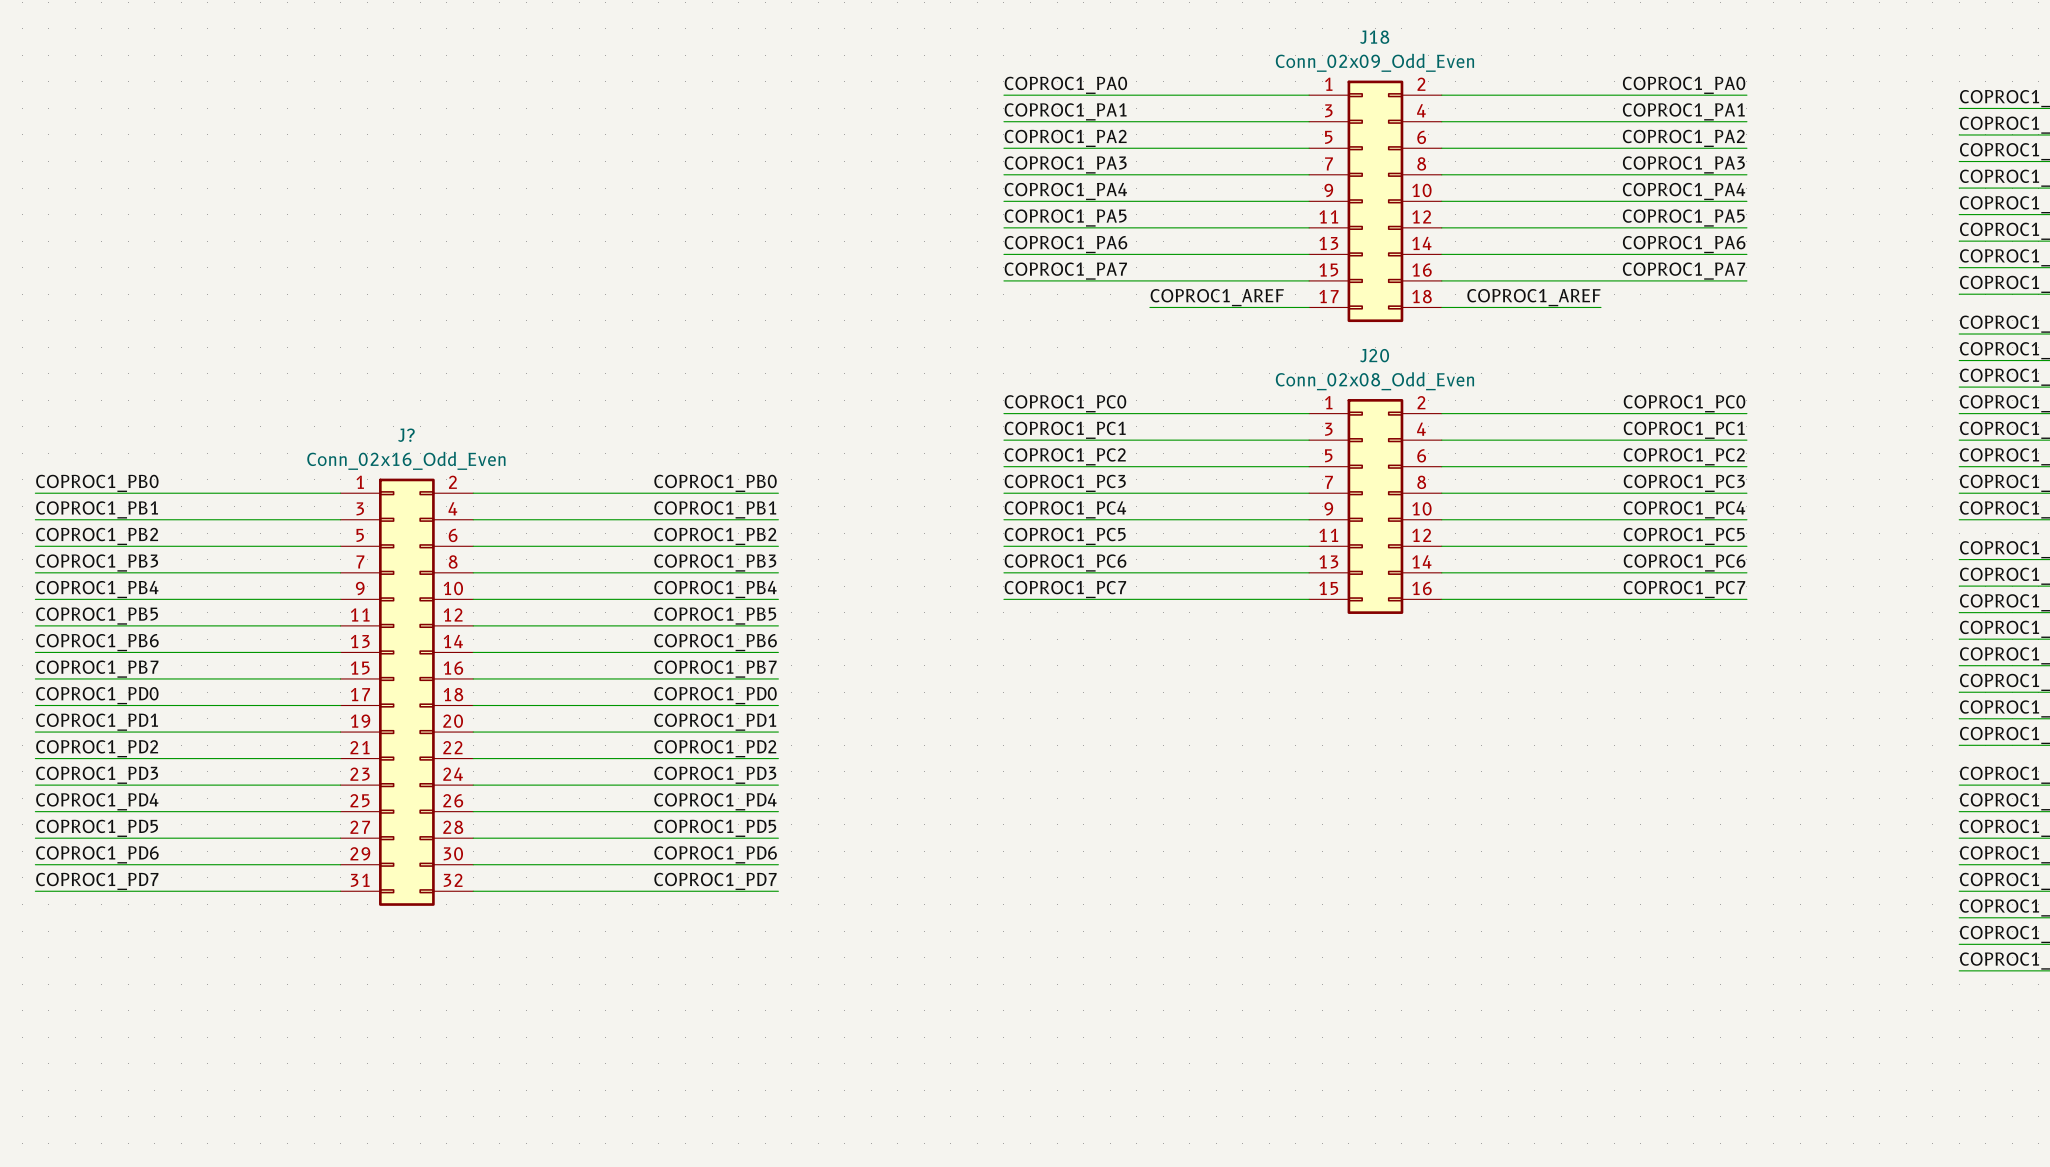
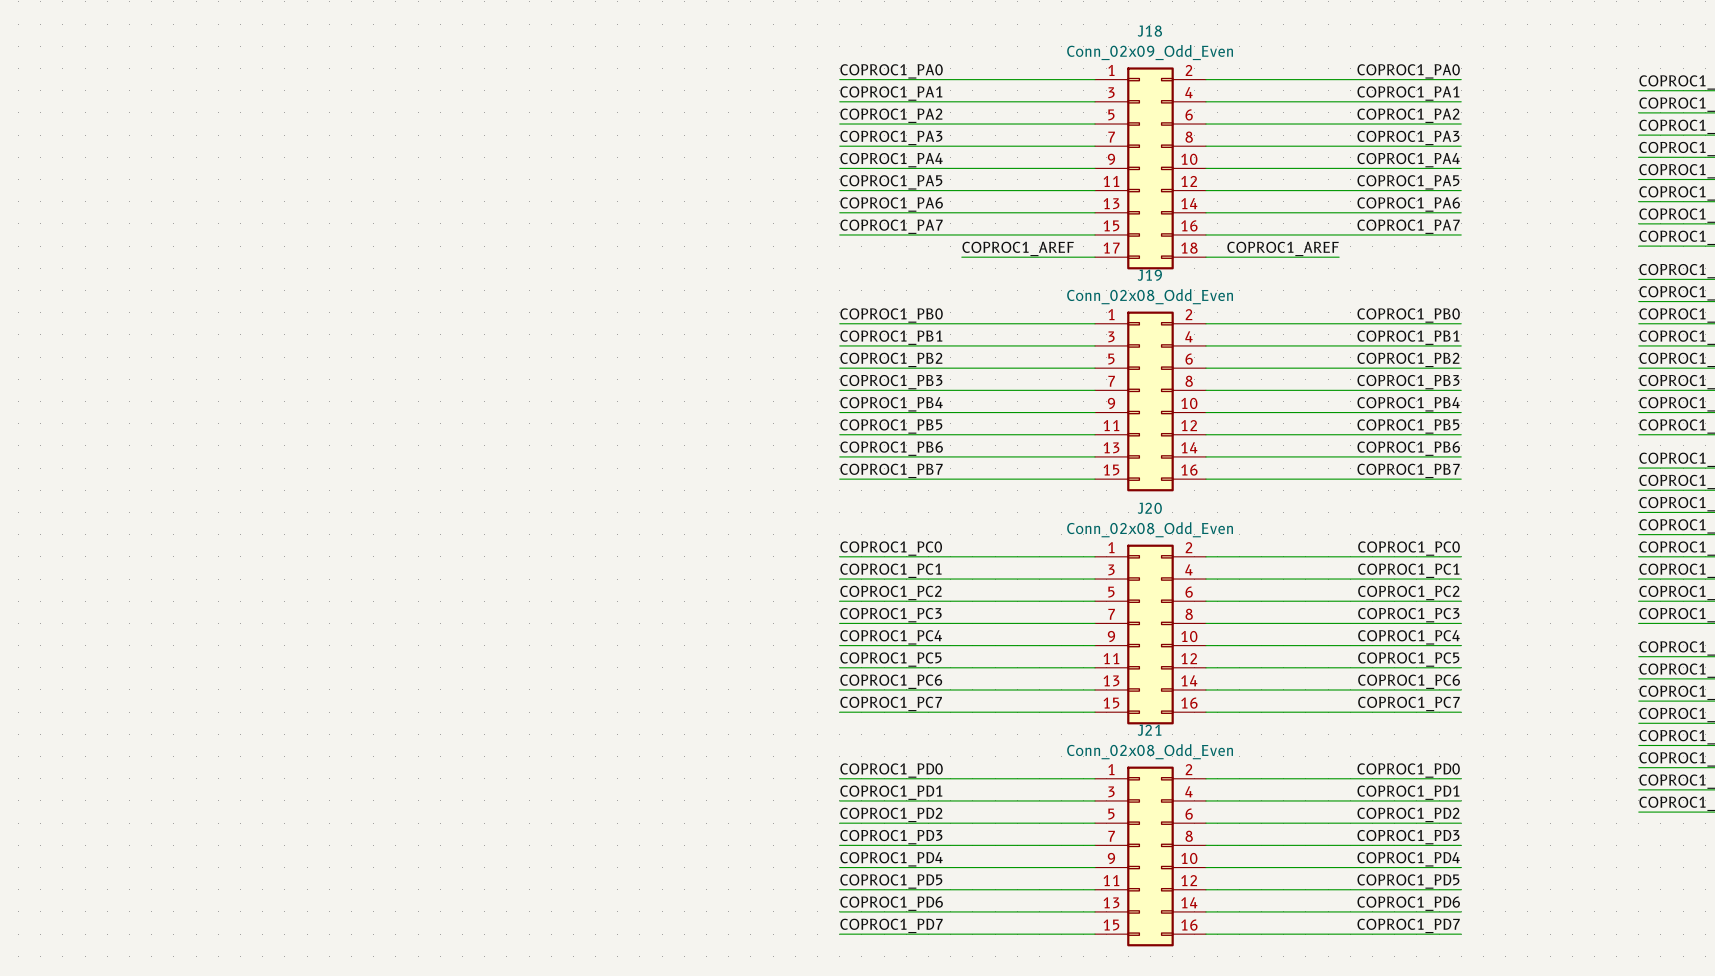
label: none -> COPROC1_PB0 (1408, 315)
wire: none -> (839, 323) (1094, 323)
wire: none -> (1205, 323) (1461, 323)
label: COPROC1_PC0 (1065, 403) -> COPROC1_PB1 (891, 337)
label: COPROC1_PC0 (1684, 403) -> COPROC1_PB1 (1408, 337)
label: COPROC1_PC1 (1065, 430) -> COPROC1_PB2 (891, 359)
label: COPROC1_PC1 (1684, 430) -> COPROC1_PB2 (1408, 359)
label: COPROC1_PC2 (1065, 456) -> COPROC1_PB3 (891, 382)
label: COPROC1_PC2 (1684, 456) -> COPROC1_PB3 (1408, 382)
J19: none -> Conn_02x08_Odd_Even (1150, 401)
label: COPROC1_PB0 (97, 483) -> none
label position: COPROC1_PB0 (715, 483) -> COPROC1_PB0 (891, 315)
label: COPROC1_PC3 (1065, 483) -> COPROC1_PB4 (891, 404)
label: COPROC1_PC3 (1684, 483) -> COPROC1_PB4 (1408, 404)
wire: (35, 493) (340, 493) -> none
wire: (473, 493) (778, 493) -> none
J20 position: (1375, 506) -> (1150, 634)
label: COPROC1_PB1 (97, 509) -> none
label: COPROC1_PB1 (715, 509) -> none
label: COPROC1_PC4 (1065, 509) -> COPROC1_PB5 (891, 426)
label: COPROC1_PC4 (1684, 509) -> COPROC1_PB5 (1408, 426)
wire: (35, 519) (340, 519) -> none
wire: (473, 519) (778, 519) -> none
label: COPROC1_PB2 (97, 536) -> none
label: COPROC1_PB2 (715, 536) -> none
label: COPROC1_PC5 (1065, 536) -> COPROC1_PB6 (891, 448)
label: COPROC1_PC5 (1684, 536) -> COPROC1_PB6 (1408, 448)
wire: (35, 546) (340, 546) -> none
wire: (473, 546) (778, 546) -> none
label: COPROC1_PB3 (97, 562) -> none
label: COPROC1_PB3 (715, 562) -> none
label: COPROC1_PC6 (1065, 562) -> COPROC1_PB7 (891, 470)
label: COPROC1_PC6 (1684, 562) -> COPROC1_PB7 (1408, 470)
wire: (35, 572) (340, 572) -> none
wire: (473, 572) (778, 572) -> none
label: COPROC1_PB4 (97, 589) -> none
label: COPROC1_PB4 (715, 589) -> none
label position: COPROC1_PC7 (1065, 589) -> COPROC1_PC7 (891, 703)
label position: COPROC1_PC7 (1684, 589) -> COPROC1_PC7 (1408, 703)
wire: (35, 599) (340, 599) -> none
wire: (473, 599) (778, 599) -> none
wire: (1003, 599) (1309, 599) -> (839, 556) (1094, 556)
wire: (1441, 599) (1746, 599) -> (1205, 556) (1461, 556)
label: COPROC1_PB5 (97, 616) -> none
label: COPROC1_PB5 (715, 616) -> none
wire: (35, 625) (340, 625) -> none
wire: (473, 625) (778, 625) -> none
label: COPROC1_PB6 (97, 642) -> none
label: COPROC1_PB6 (715, 642) -> none
wire: (35, 652) (340, 652) -> none
wire: (473, 652) (778, 652) -> none
label: none -> COPROC1_PC0 (891, 548)
label: none -> COPROC1_PC0 (1409, 548)
label: COPROC1_PB7 (97, 669) -> none
label: COPROC1_PB7 (715, 669) -> none
wire: (35, 678) (340, 678) -> none
wire: (473, 678) (778, 678) -> none
label: none -> COPROC1_PC1 (890, 570)
label: none -> COPROC1_PC1 (1408, 570)
J?: Conn_02x16_Odd_Even (406, 692) -> none
wire: none -> (839, 579) (1094, 579)
wire: none -> (1205, 579) (1461, 579)
label: COPROC1_PD0 (97, 695) -> none
label: COPROC1_PD0 (715, 695) -> none
wire: (35, 705) (340, 705) -> none
wire: (473, 705) (778, 705) -> none
label: none -> COPROC1_PC2 (891, 592)
label: none -> COPROC1_PC2 (1408, 592)
wire: none -> (839, 601) (1094, 601)
wire: none -> (1205, 601) (1461, 601)
label: COPROC1_PD1 (97, 722) -> none
label: COPROC1_PD1 (715, 722) -> none
wire: (35, 732) (340, 732) -> none
wire: (473, 732) (778, 732) -> none
label: none -> COPROC1_PC3 (891, 615)
label: none -> COPROC1_PC3 (1408, 615)
wire: none -> (839, 623) (1094, 623)
wire: none -> (1205, 623) (1461, 623)
label: COPROC1_PD2 (97, 748) -> none
label: COPROC1_PD2 (715, 748) -> none
wire: (35, 758) (340, 758) -> none
wire: (473, 758) (778, 758) -> none
label: none -> COPROC1_PC4 (891, 637)
label: none -> COPROC1_PC4 (1408, 637)
wire: none -> (839, 645) (1094, 645)
wire: none -> (1205, 645) (1461, 645)
label: COPROC1_PD3 (97, 775) -> none
label: COPROC1_PD3 (715, 775) -> none
wire: (35, 785) (340, 785) -> none
wire: (473, 785) (778, 785) -> none
label: none -> COPROC1_PC5 (890, 659)
label: none -> COPROC1_PC5 (1408, 659)
wire: none -> (839, 667) (1094, 667)
wire: none -> (1205, 667) (1461, 667)
label: COPROC1_PD4 (97, 801) -> none
label: COPROC1_PD4 (715, 801) -> none
wire: (35, 811) (340, 811) -> none
wire: (473, 811) (778, 811) -> none
label: none -> COPROC1_PC6 (891, 681)
label: none -> COPROC1_PC6 (1409, 681)
wire: none -> (839, 689) (1094, 689)
wire: none -> (1205, 689) (1461, 689)
label: COPROC1_PD5 (97, 828) -> none
label: COPROC1_PD5 (715, 828) -> none
wire: (35, 838) (340, 838) -> none
wire: (473, 838) (778, 838) -> none
wire: none -> (839, 712) (1094, 712)
wire: none -> (1205, 712) (1461, 712)
label: COPROC1_PD6 (97, 854) -> none
label: COPROC1_PD6 (715, 854) -> none
wire: (35, 864) (340, 864) -> none
wire: (473, 864) (778, 864) -> none
label: COPROC1_PD7 (97, 881) -> none
label: COPROC1_PD7 (715, 881) -> none
wire: (35, 891) (340, 891) -> none
wire: (473, 891) (778, 891) -> none
label: none -> COPROC1_PD0 (891, 770)
label: none -> COPROC1_PD0 (1408, 770)
wire: none -> (839, 778) (1094, 778)
wire: none -> (1205, 778) (1461, 778)
label: none -> COPROC1_PD1 (891, 792)
label: none -> COPROC1_PD1 (1408, 792)
wire: none -> (839, 800) (1094, 800)
wire: none -> (1205, 800) (1461, 800)
label: none -> COPROC1_PD2 (891, 814)
label: none -> COPROC1_PD2 (1408, 814)
wire: none -> (839, 823) (1094, 823)
wire: none -> (1205, 823) (1461, 823)
label: none -> COPROC1_PD3 (891, 837)
label: none -> COPROC1_PD3 (1408, 837)
wire: none -> (839, 845) (1094, 845)
wire: none -> (1205, 845) (1461, 845)
J21: none -> Conn_02x08_Odd_Even (1150, 856)
label: none -> COPROC1_PD4 (891, 859)
label: none -> COPROC1_PD4 (1408, 859)
wire: none -> (839, 867) (1094, 867)
wire: none -> (1205, 867) (1461, 867)
label: none -> COPROC1_PD5 (891, 881)
label: none -> COPROC1_PD5 (1408, 881)
wire: none -> (839, 889) (1094, 889)
wire: none -> (1205, 889) (1461, 889)
label: none -> COPROC1_PD6 (891, 903)
label: none -> COPROC1_PD6 (1408, 903)
wire: none -> (839, 911) (1094, 911)
wire: none -> (1205, 911) (1461, 911)
label: none -> COPROC1_PD7 (891, 925)
label: none -> COPROC1_PD7 (1408, 925)
wire: none -> (839, 934) (1094, 934)
wire: none -> (1205, 934) (1461, 934)

